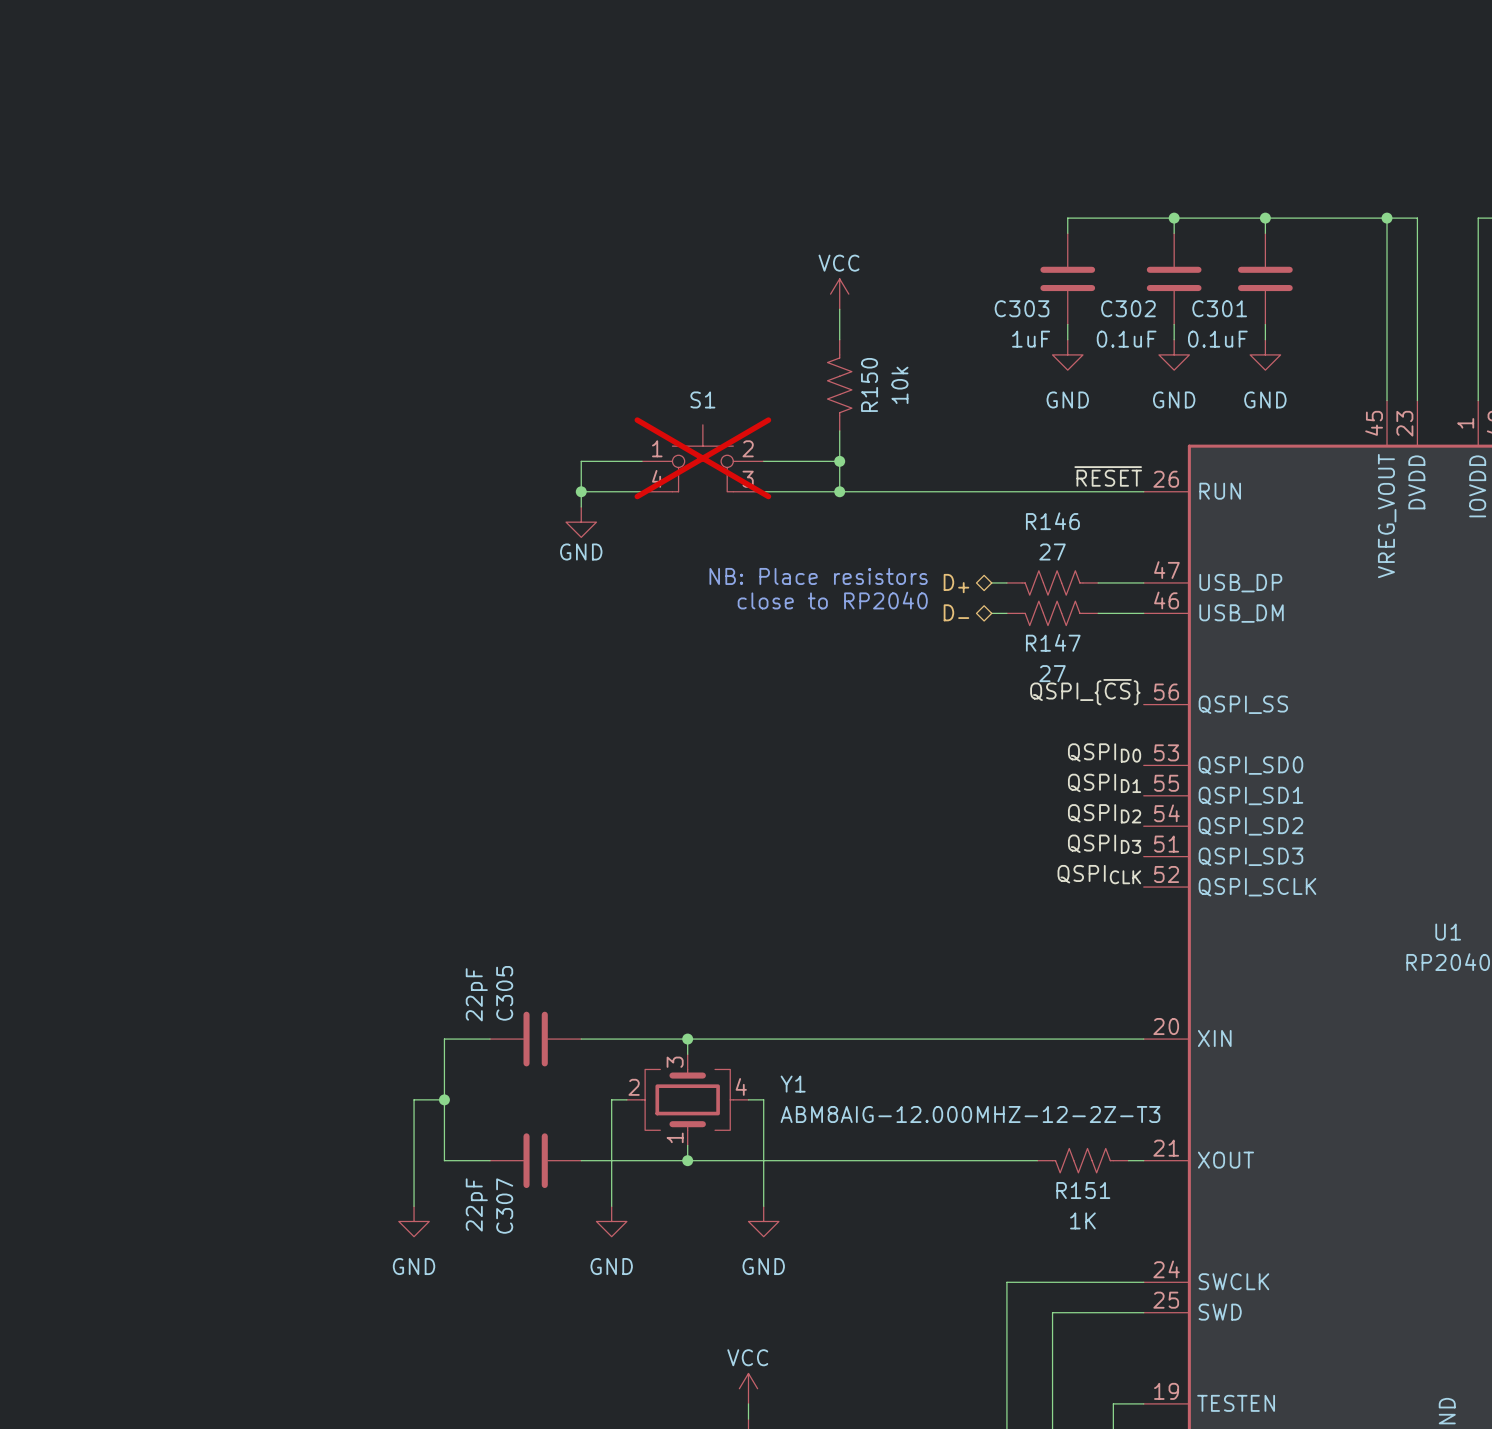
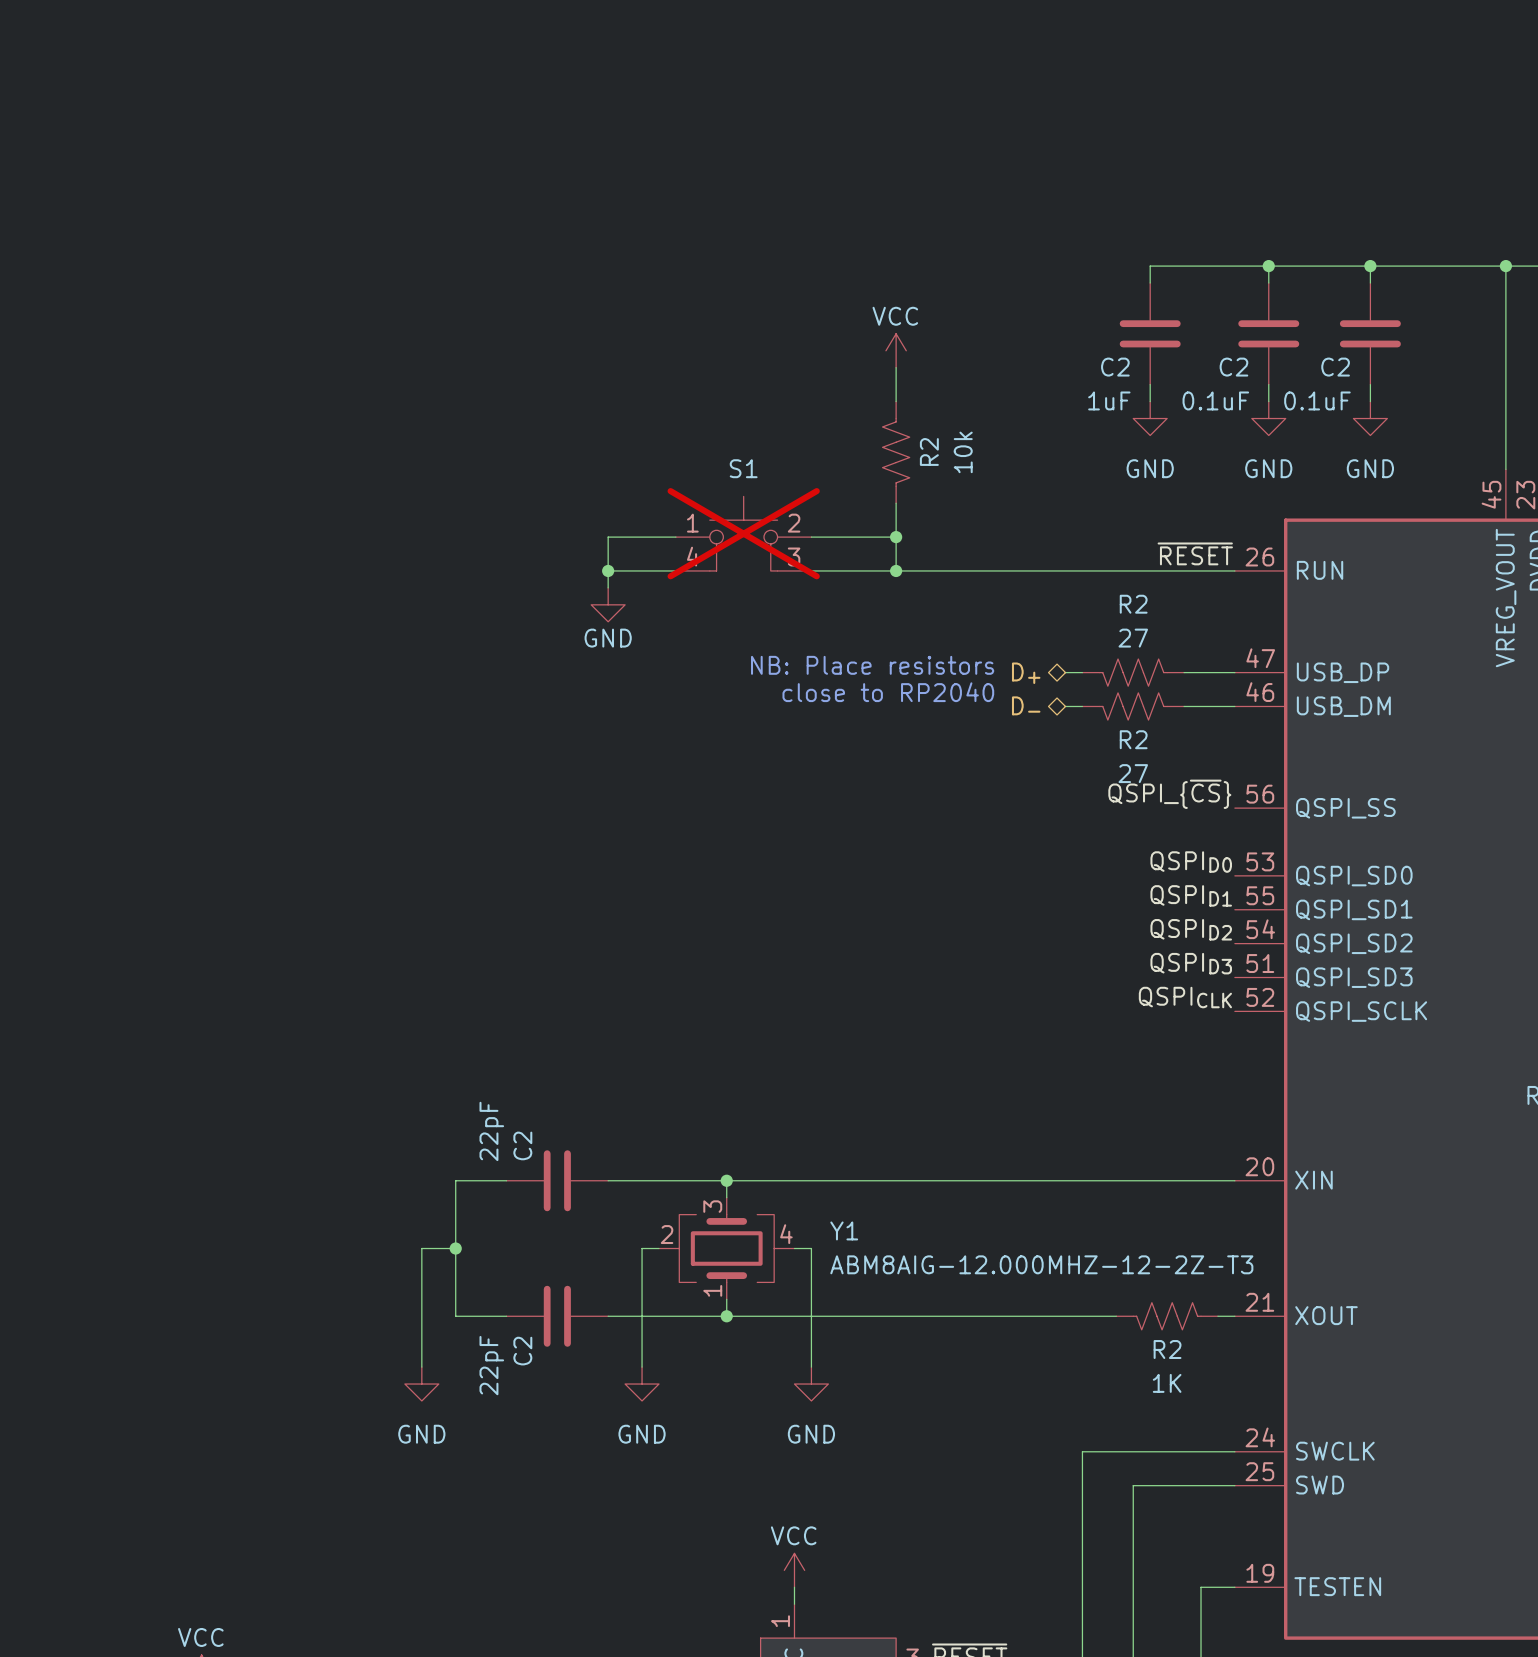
C303 name: C303 (1022, 308) -> C2 (1115, 367)
C302 name: C302 (1128, 308) -> C2 (1233, 367)
C301 name: C301 (1219, 308) -> C2 (1335, 367)
R150 name: R150 (869, 384) -> R2 (929, 452)
R146 name: R146 (1052, 521) -> R2 (1133, 604)
R147 name: R147 (1053, 642) -> R2 (1133, 739)
C305 name: C305 (504, 993) -> C2 (522, 1145)
R151 name: R151 (1083, 1190) -> R2 (1167, 1349)
C307 name: C307 (504, 1206) -> C2 (522, 1351)

